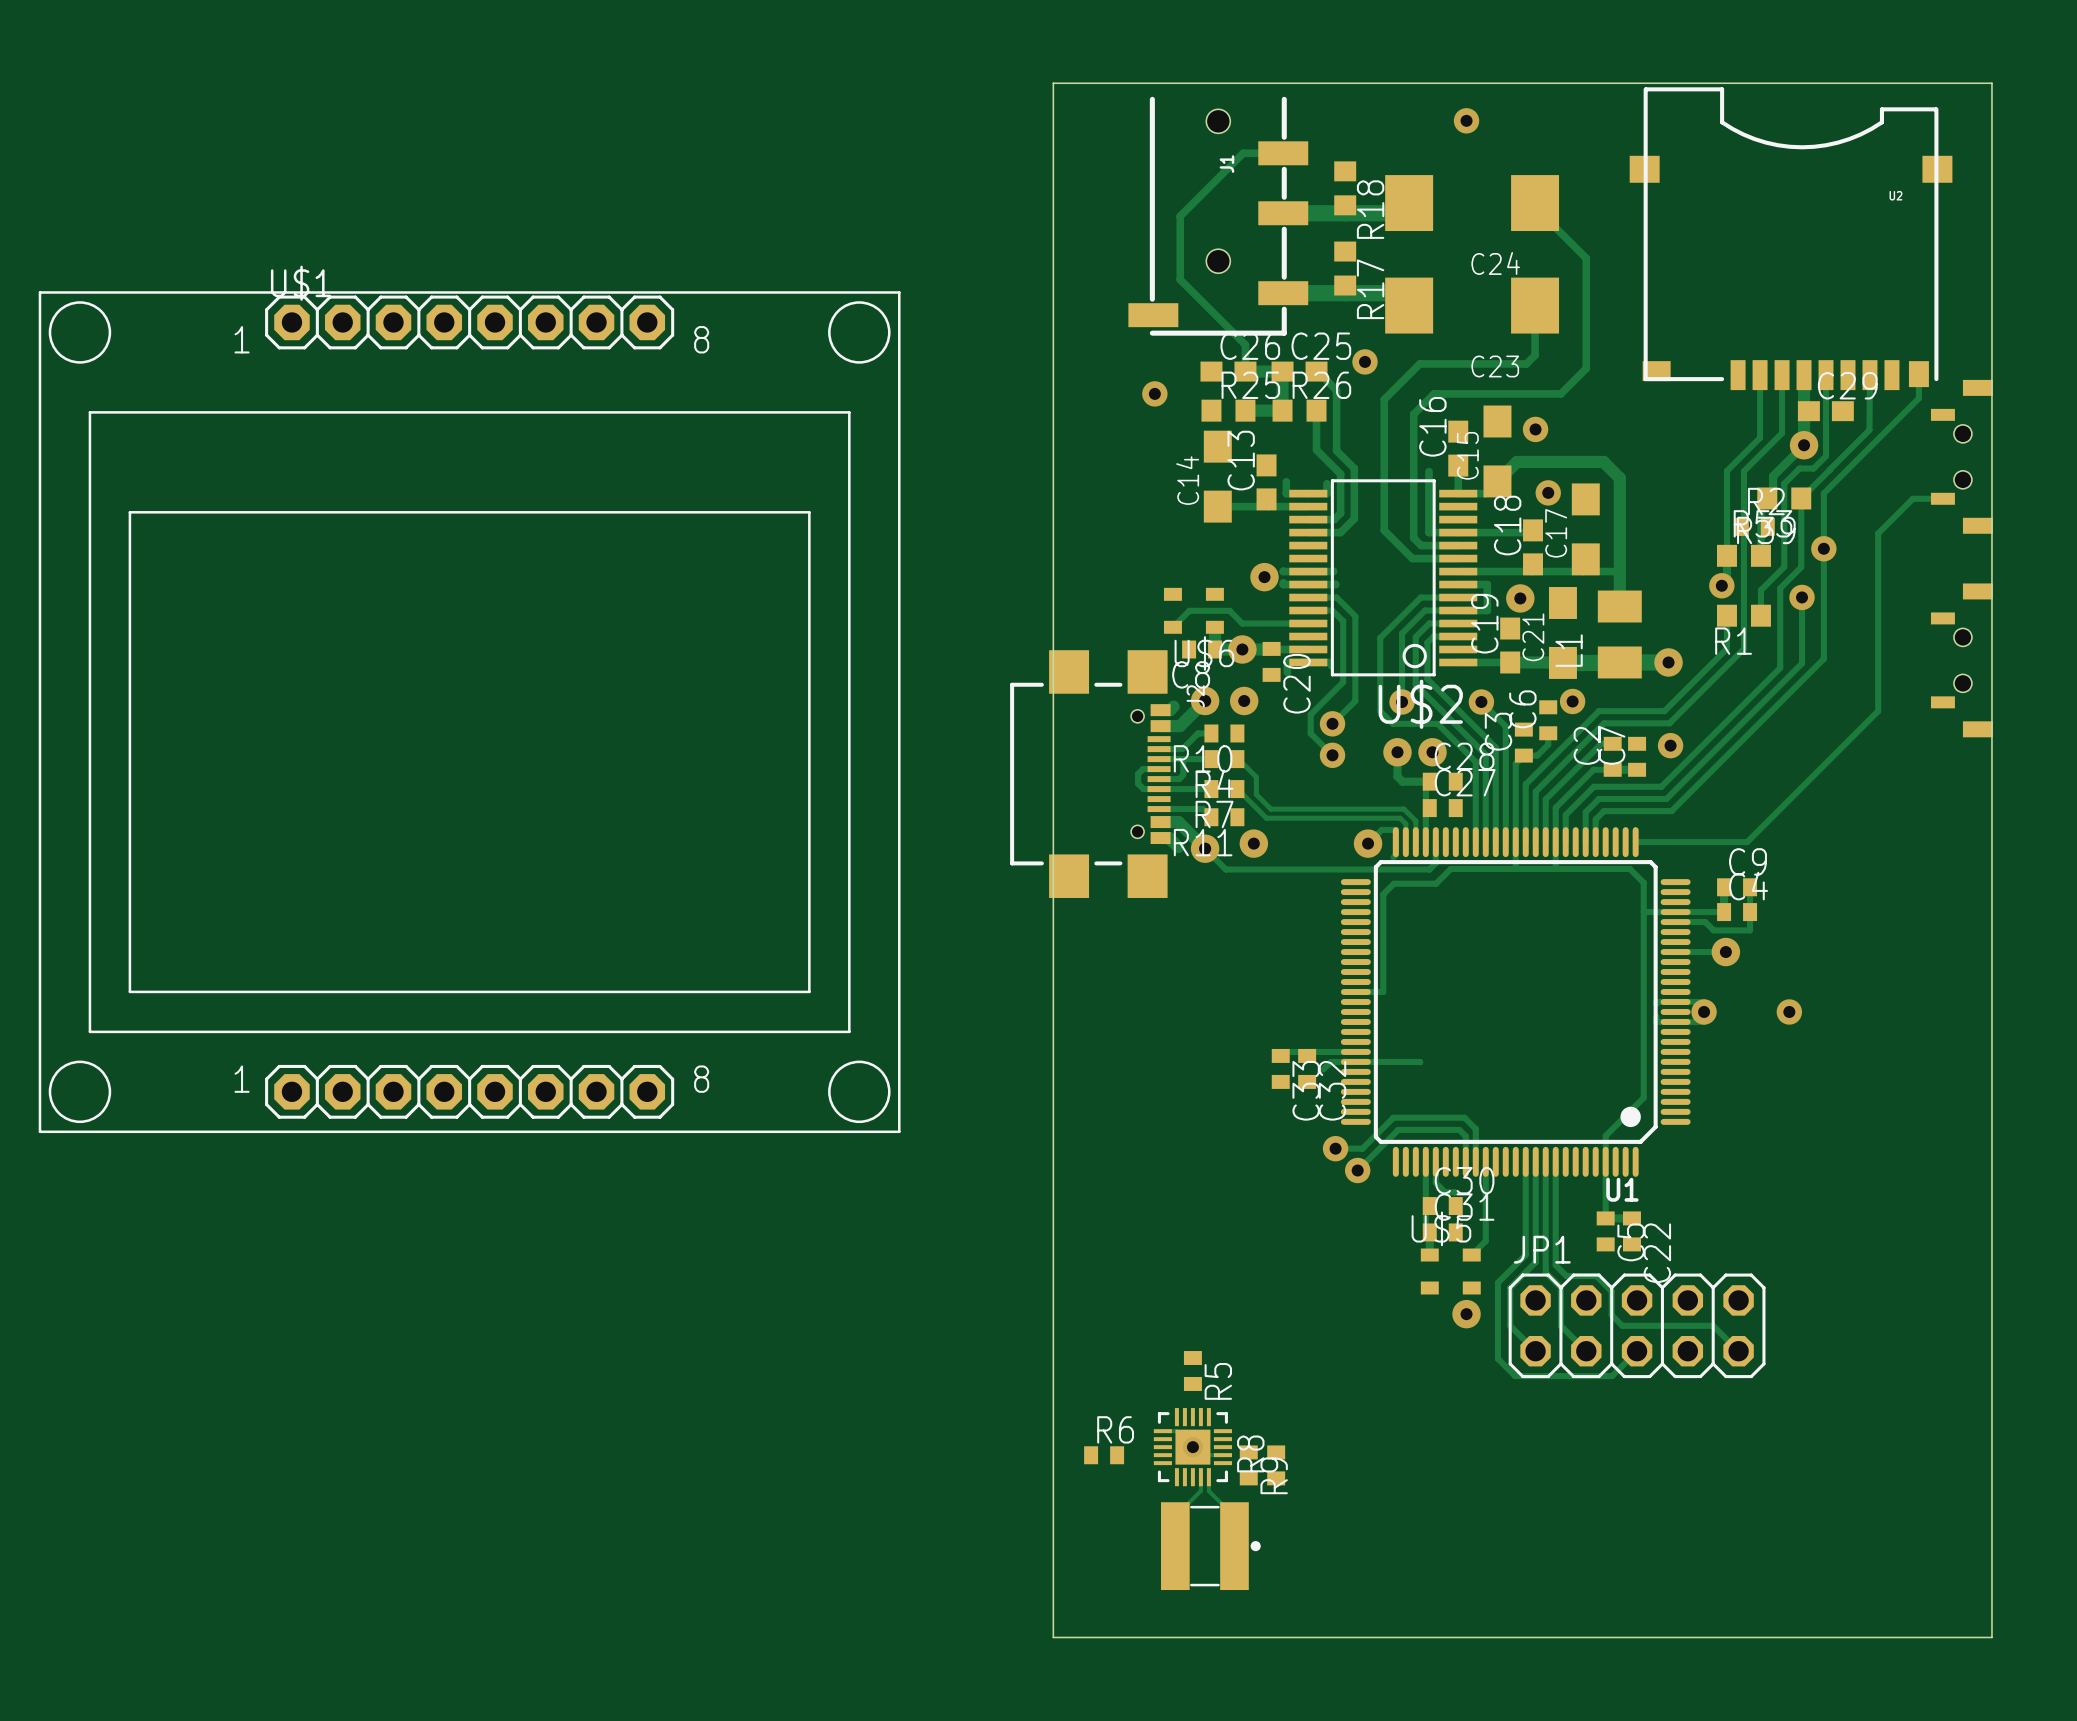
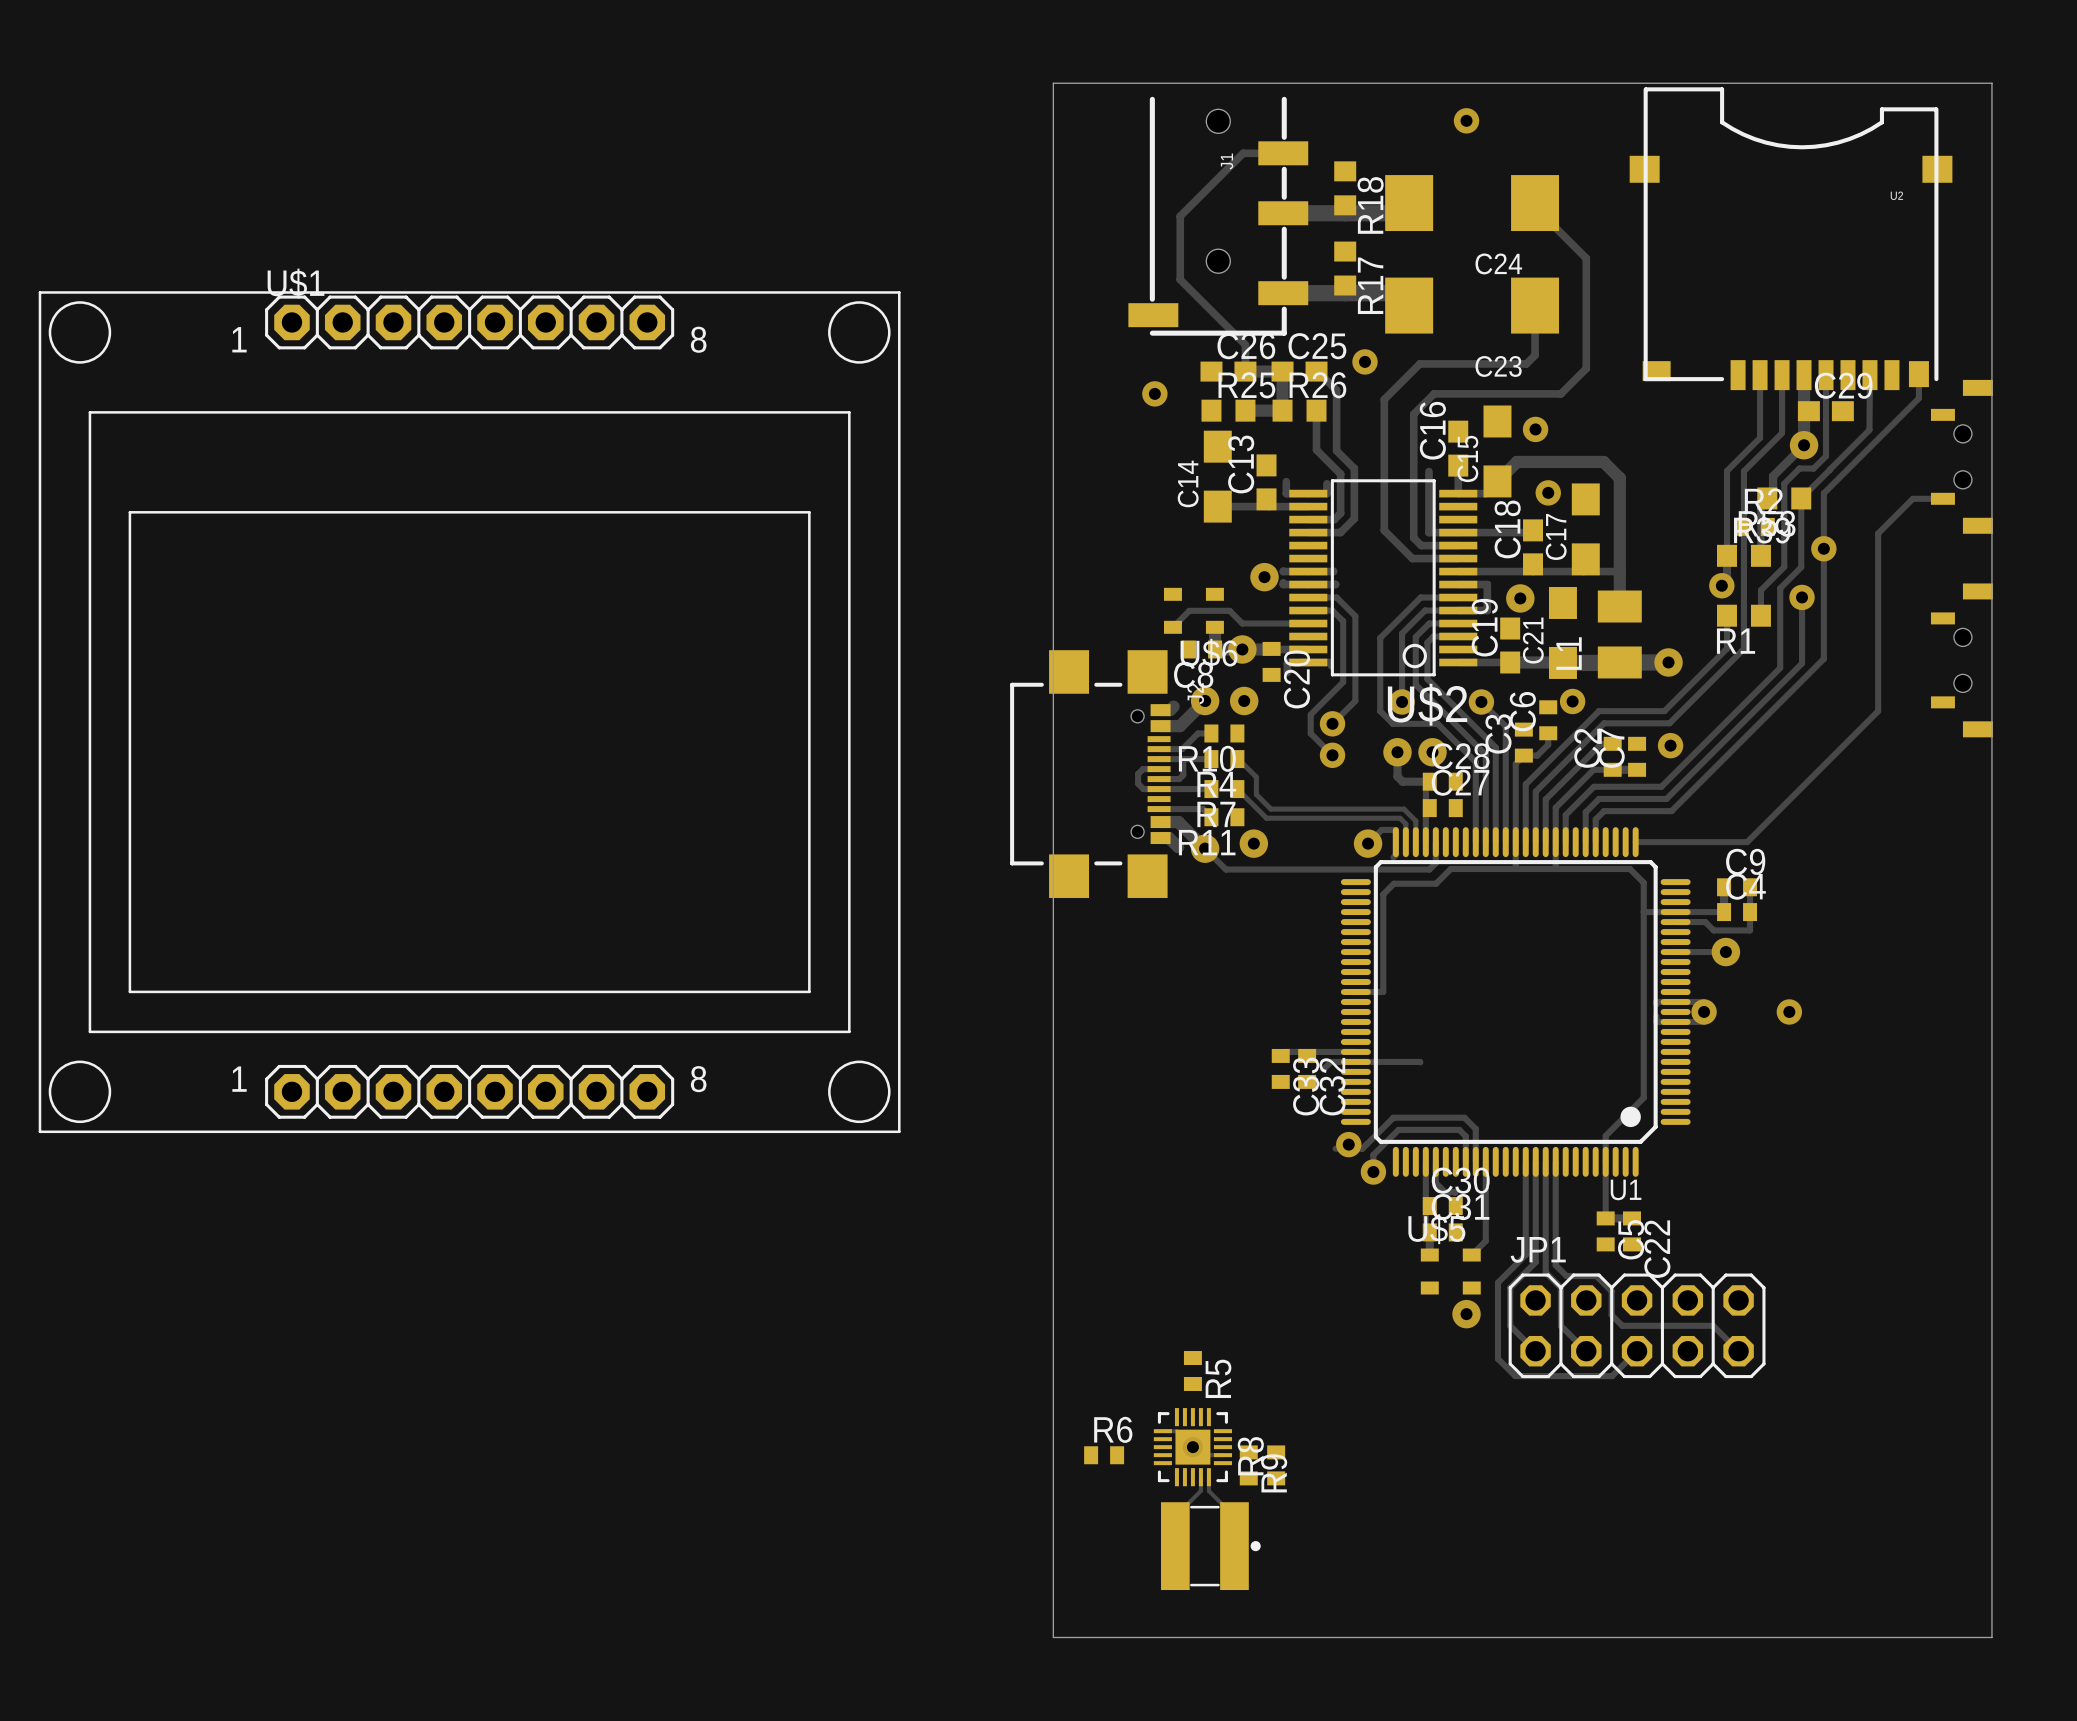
track: (1398, 1129) (1357, 1170) -> (1398, 1129) (1373, 1154) (1373, 1172)
via position: (1335, 1148) -> (1348, 1144)
via position: (1357, 1170) -> (1373, 1172)

